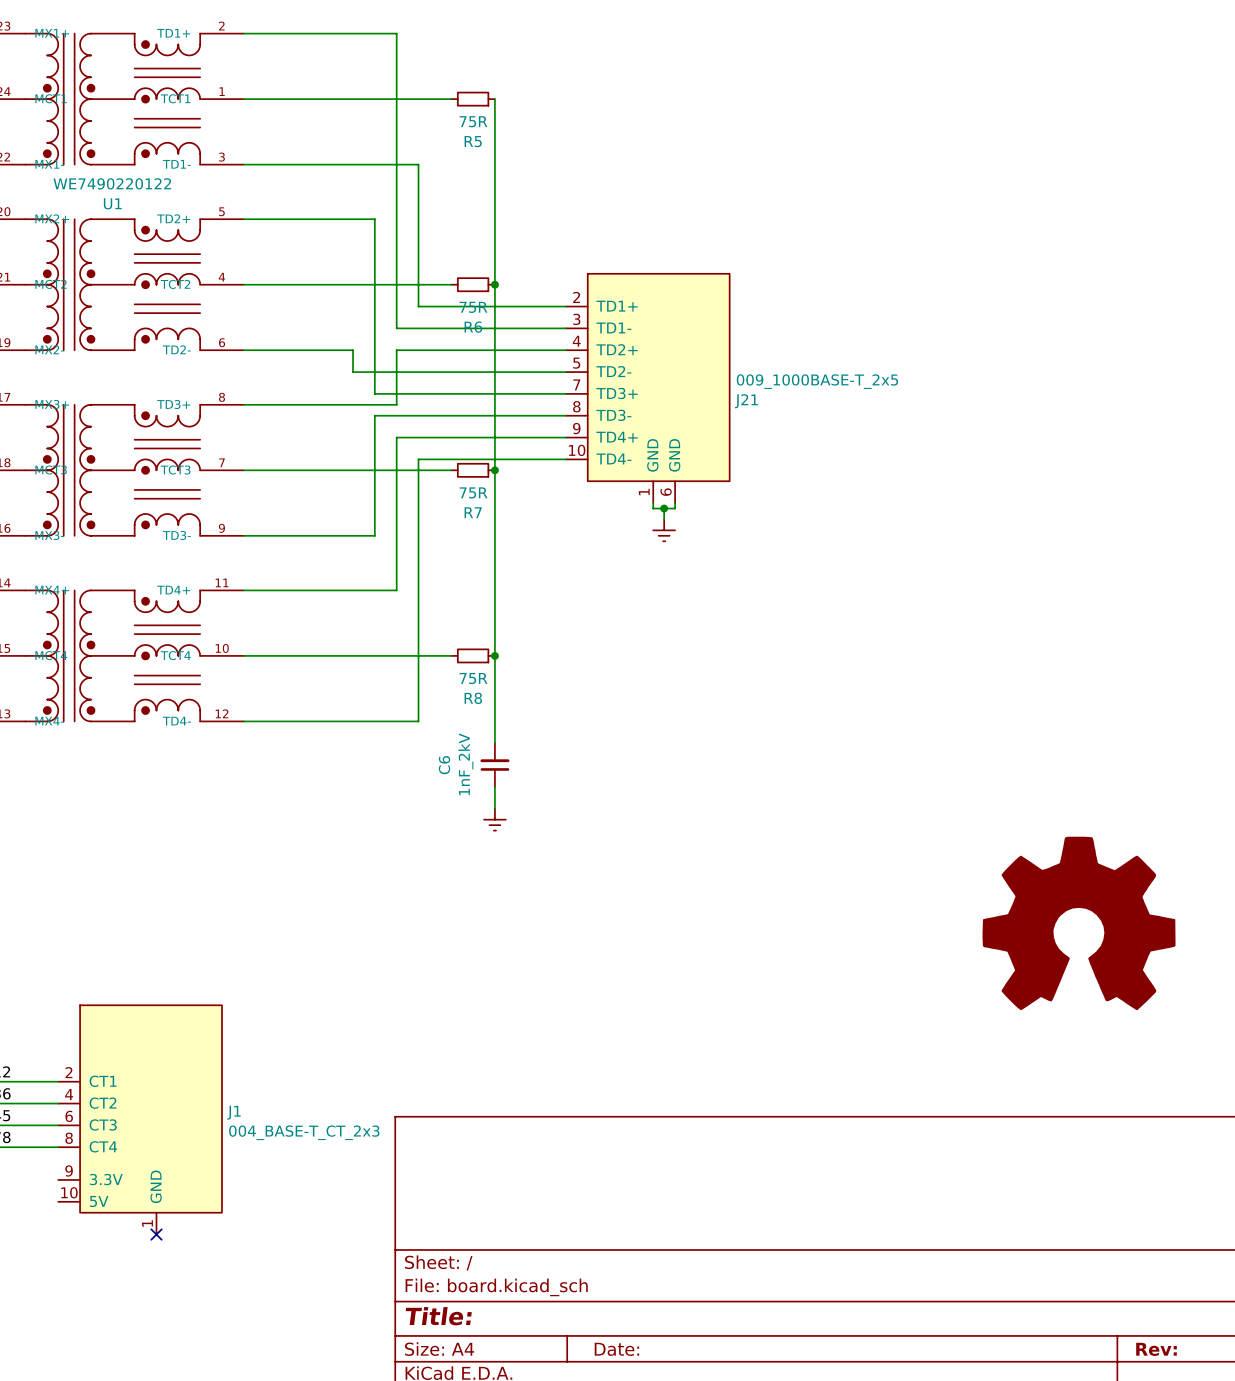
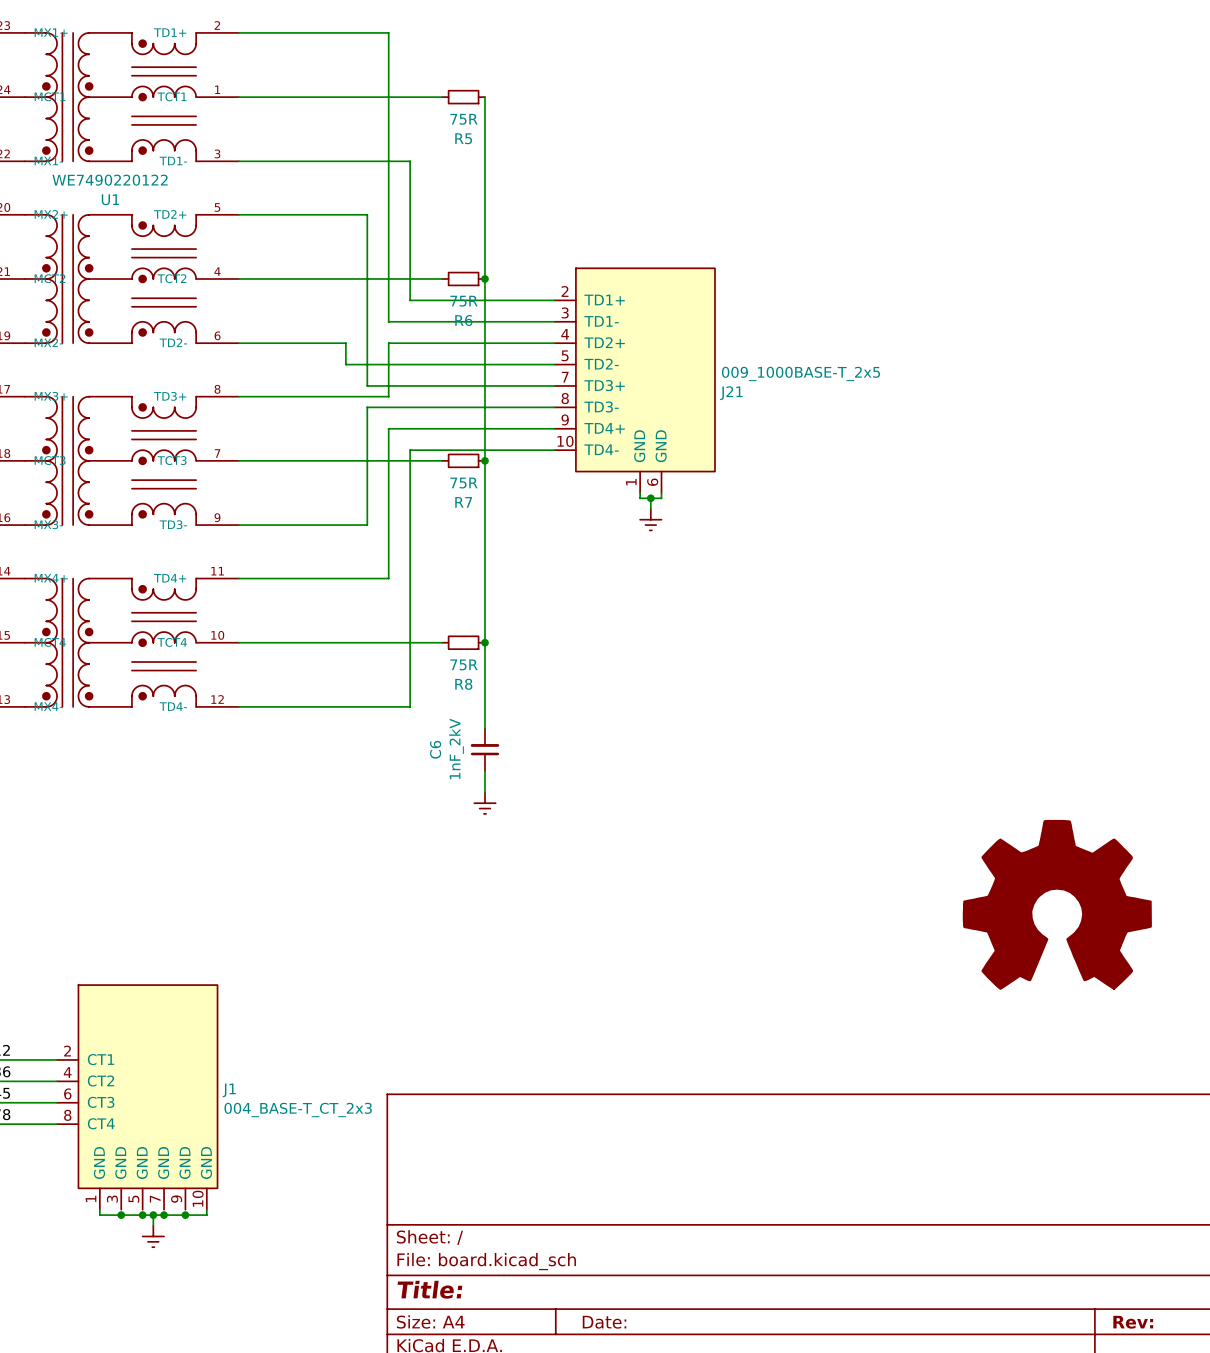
J1 symbol: [58, 1005, 222, 1235] -> [57, 985, 218, 1210]
wire: none -> (99, 1209) (99, 1215) (206, 1215) (206, 1209)
no-connect mark: (156, 1234) -> none
junction: none -> (121, 1215)
junction: none -> (142, 1215)
wire: none -> (153, 1215) (153, 1225)
junction: none -> (153, 1215)
junction: none -> (164, 1215)
junction: none -> (185, 1215)
power symbol: none -> (153, 1236)

